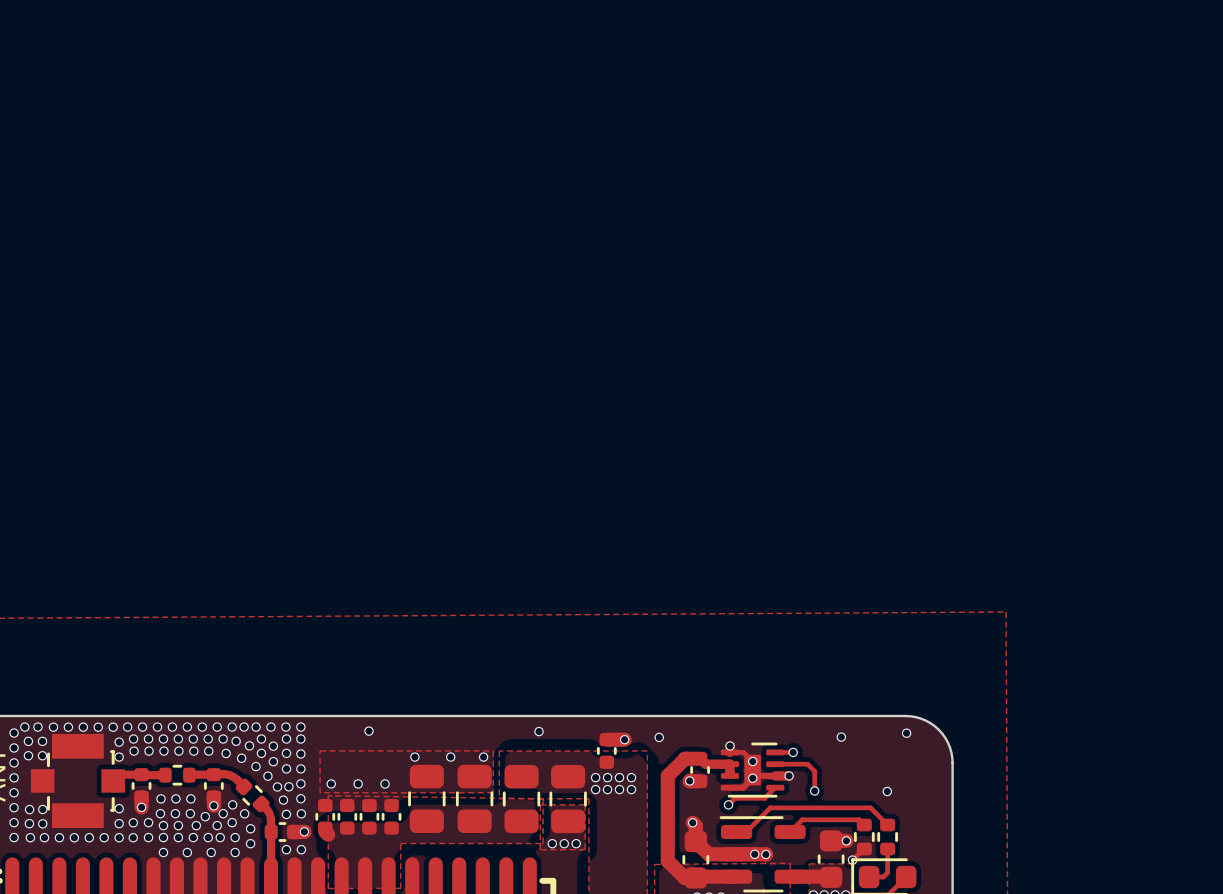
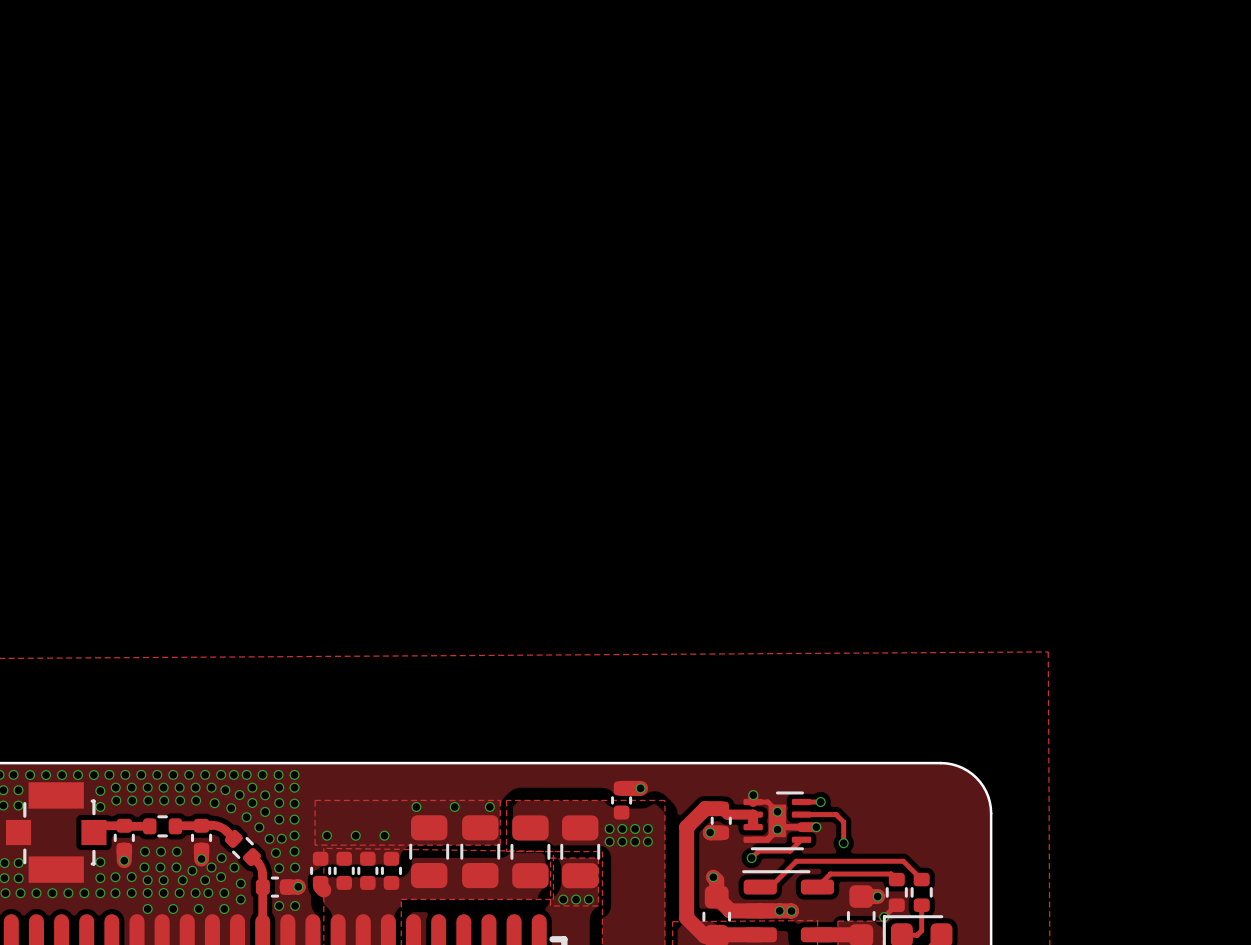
via: (368, 731) -> none
via: (539, 731) -> none
via: (906, 733) -> none
via: (659, 737) -> none
via: (841, 737) -> none
via: (887, 791) -> none

